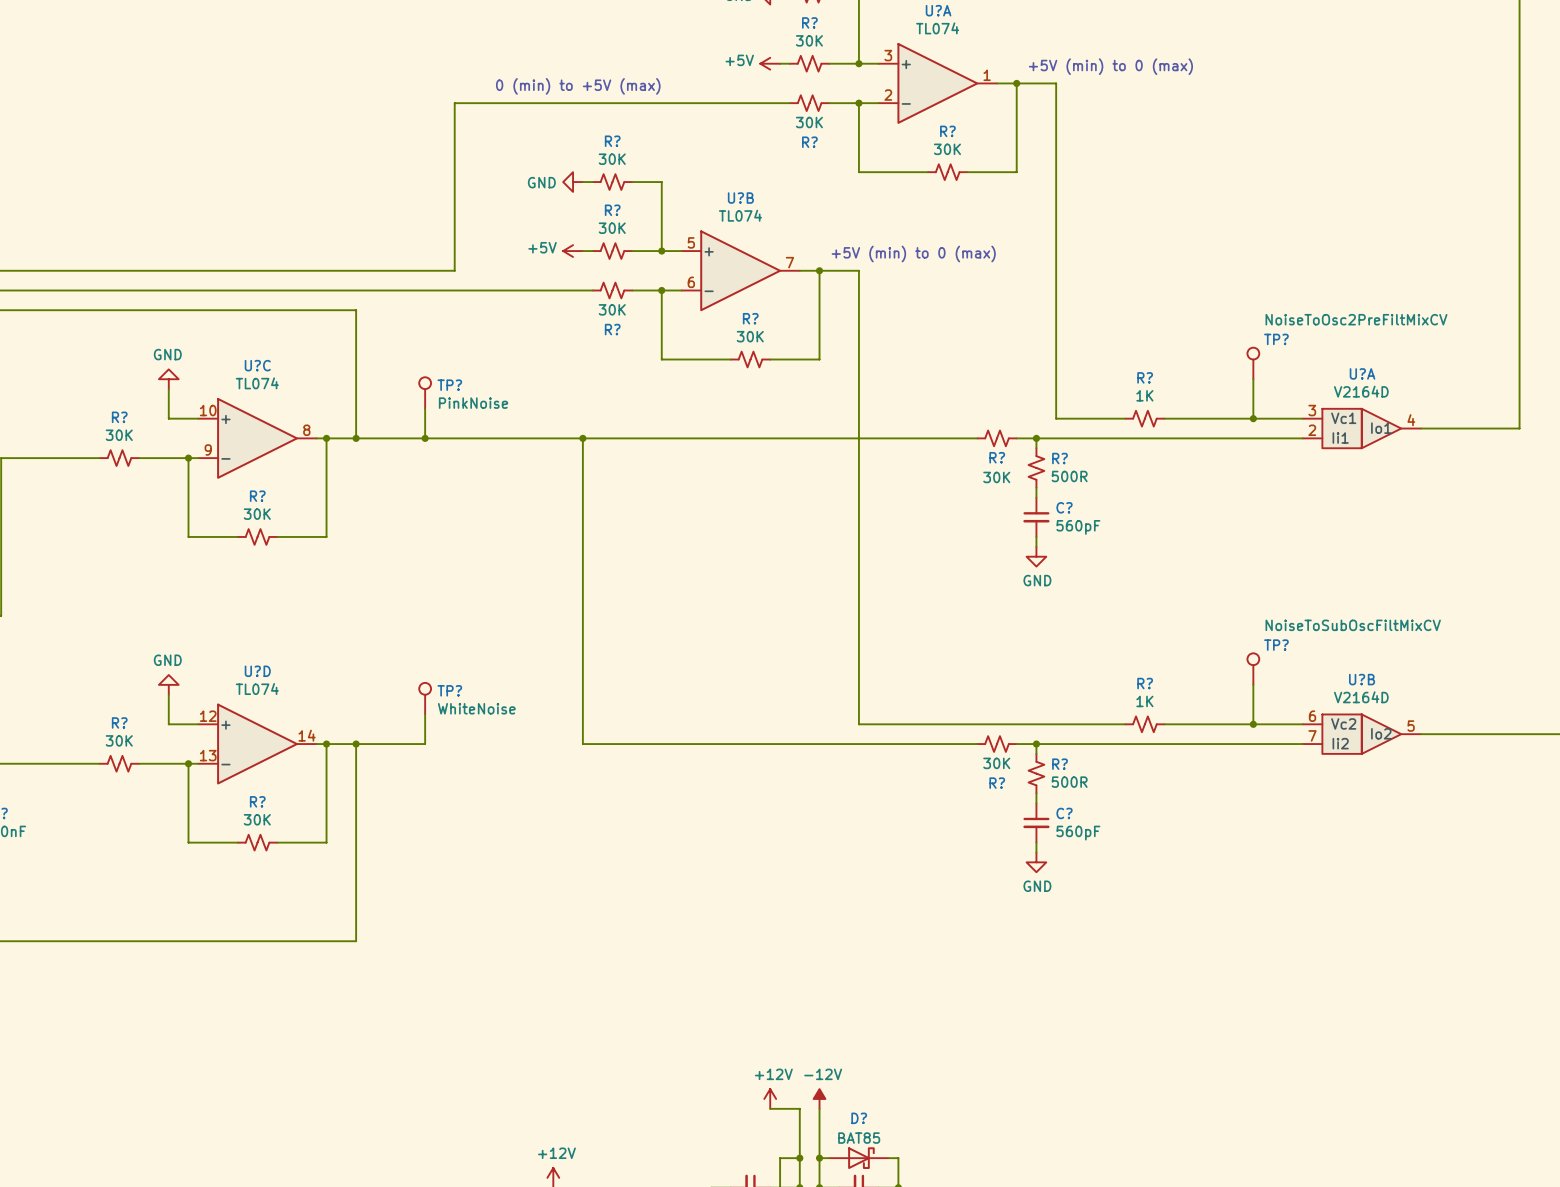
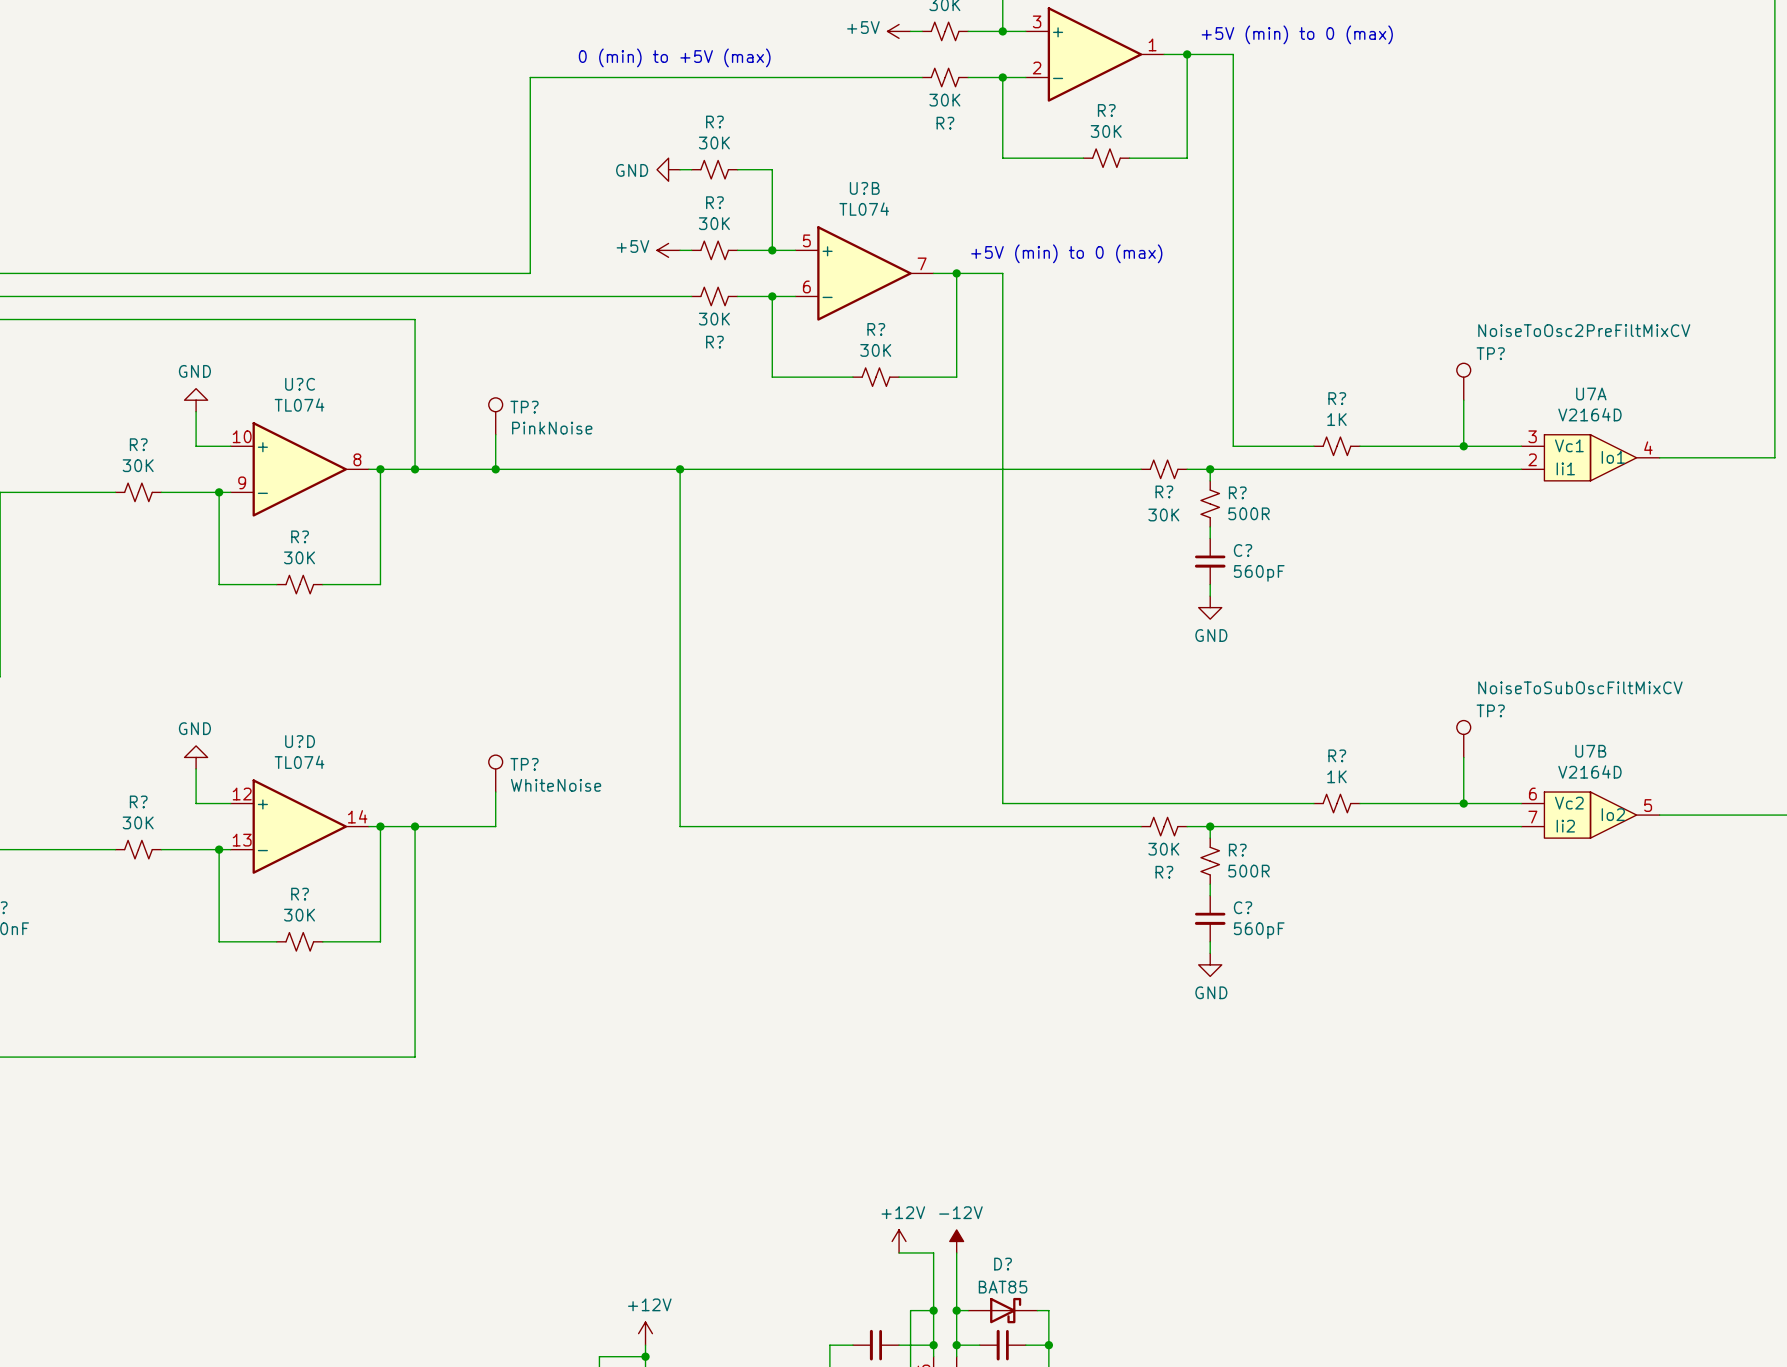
U?A name: U?A (1362, 373) -> U7A (1591, 393)
U?B name: U?B (1362, 679) -> U7B (1590, 751)

